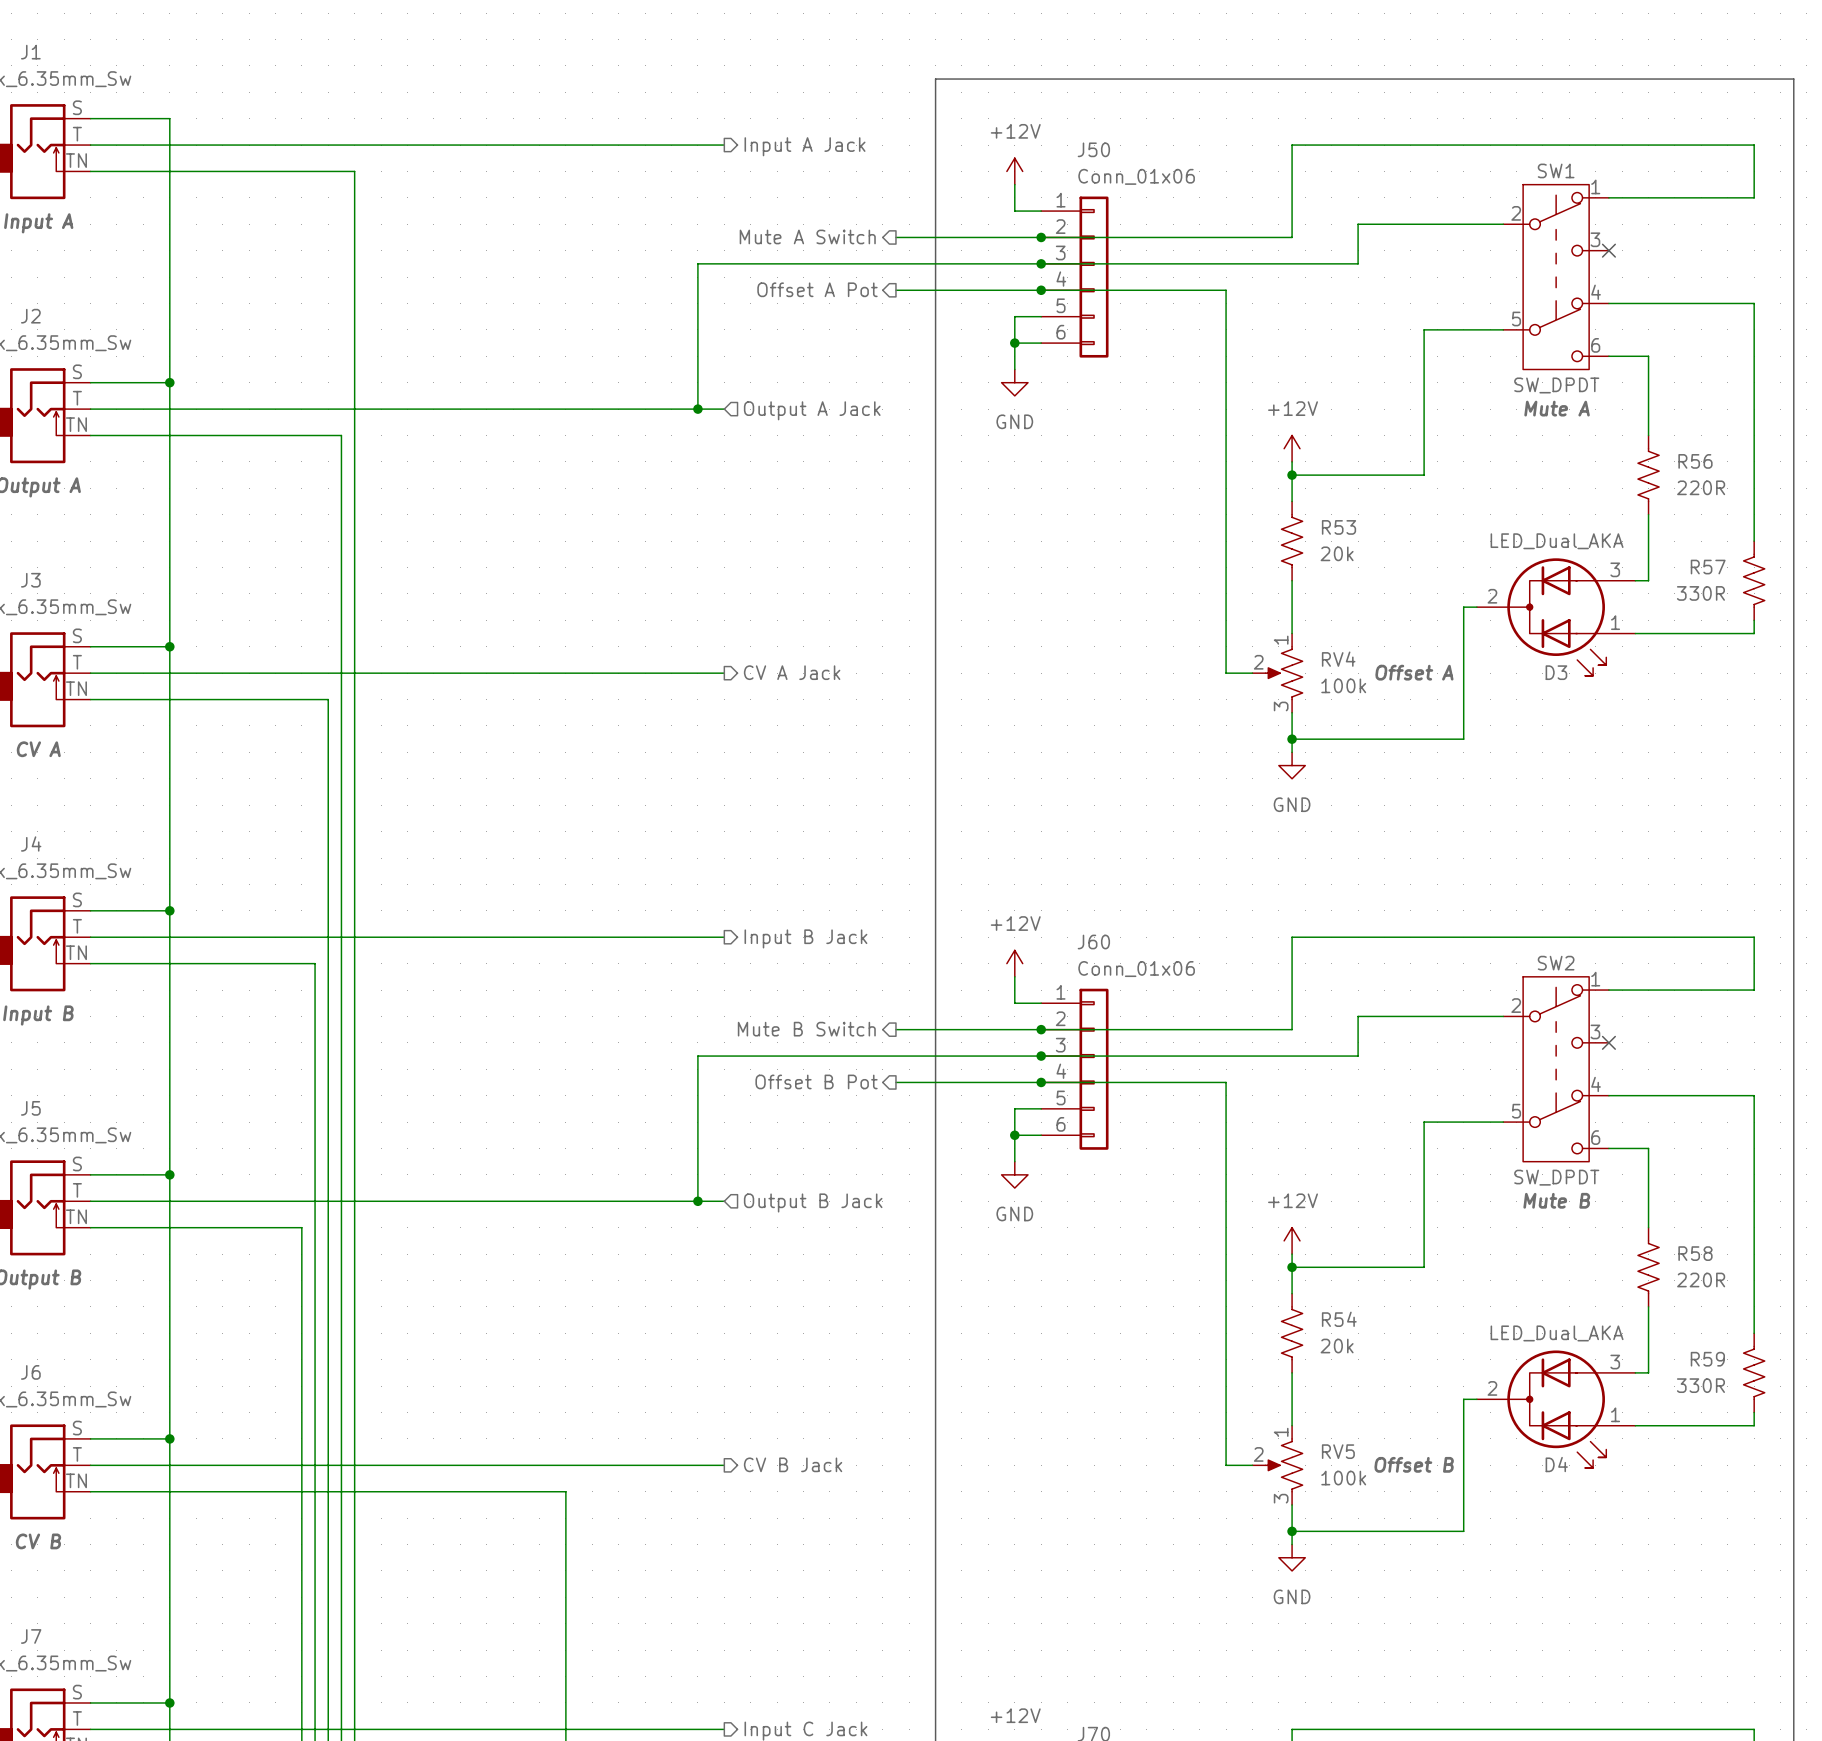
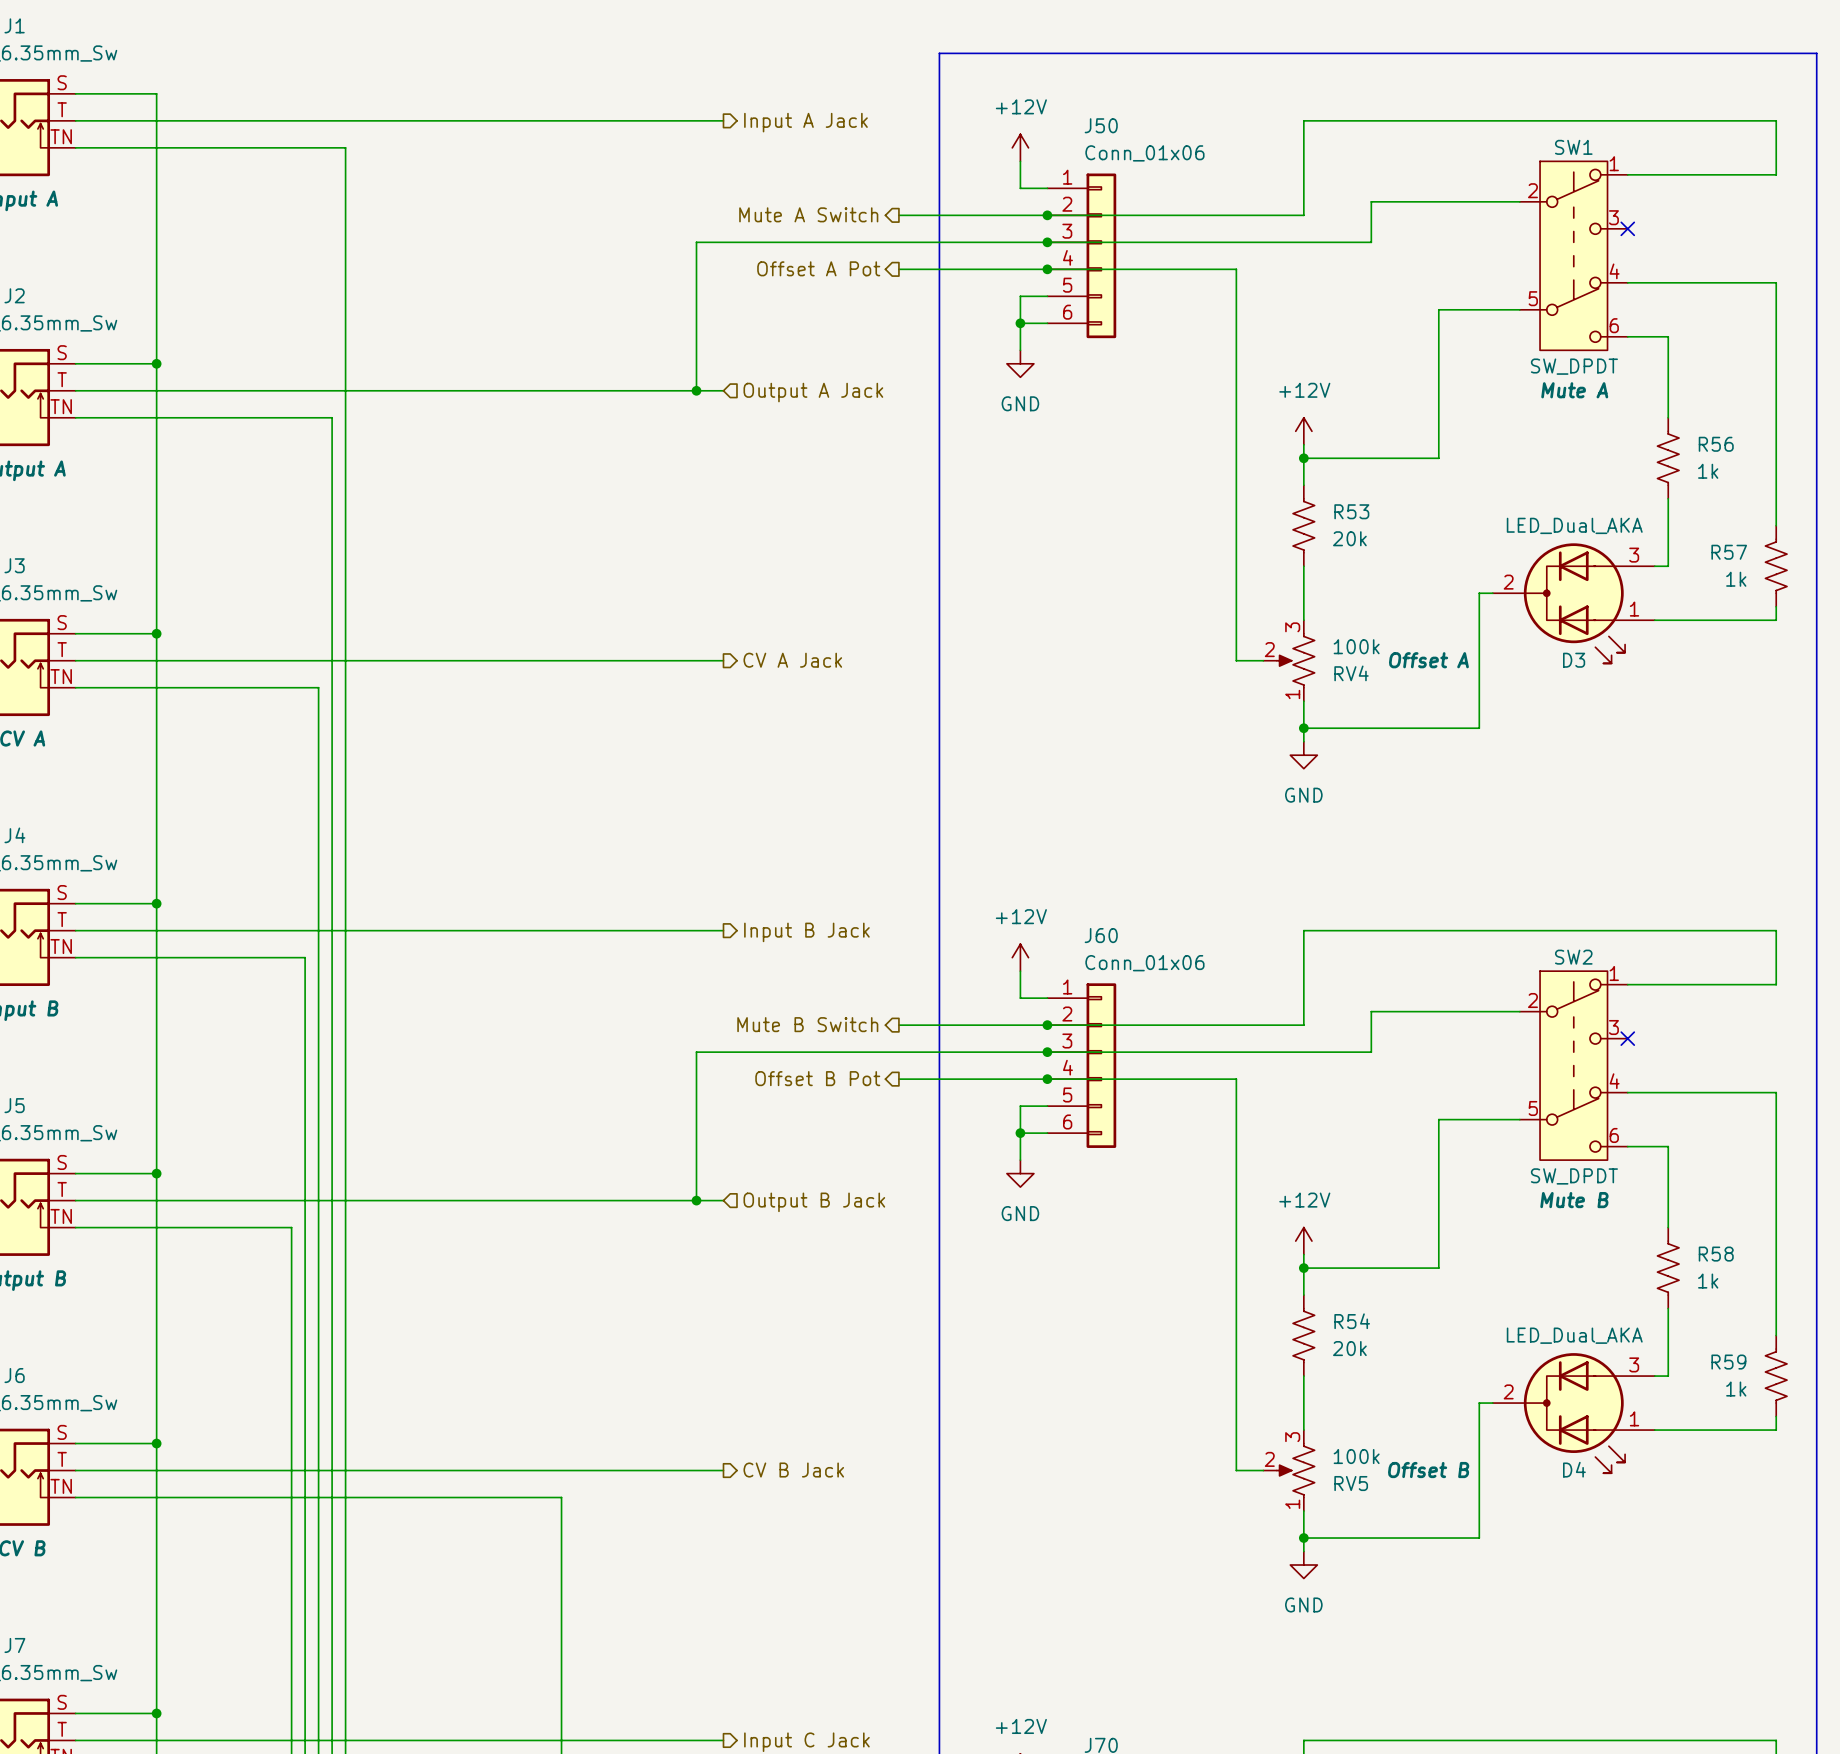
R56 value: 220R (1701, 487) -> 1k (1708, 471)
R57 value: 330R (1700, 593) -> 1k (1736, 579)
RV4 flip: as is (1284, 673) -> up-down (1295, 660)
R58 value: 220R (1701, 1280) -> 1k (1708, 1281)
R59 value: 330R (1700, 1385) -> 1k (1736, 1389)
RV5 flip: as is (1284, 1465) -> up-down (1295, 1470)

